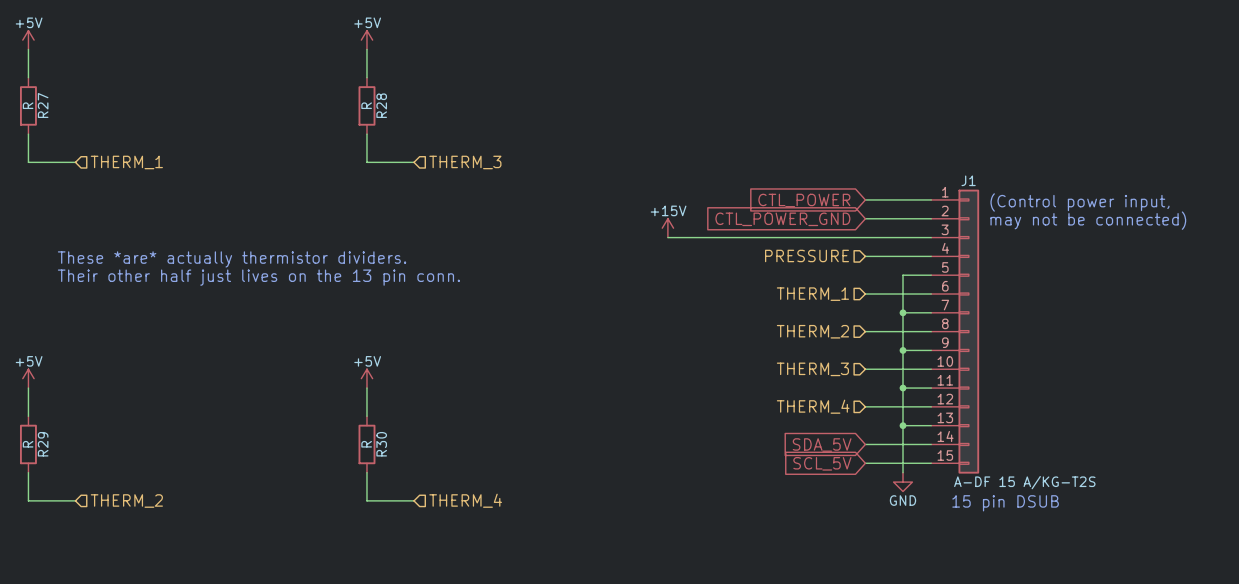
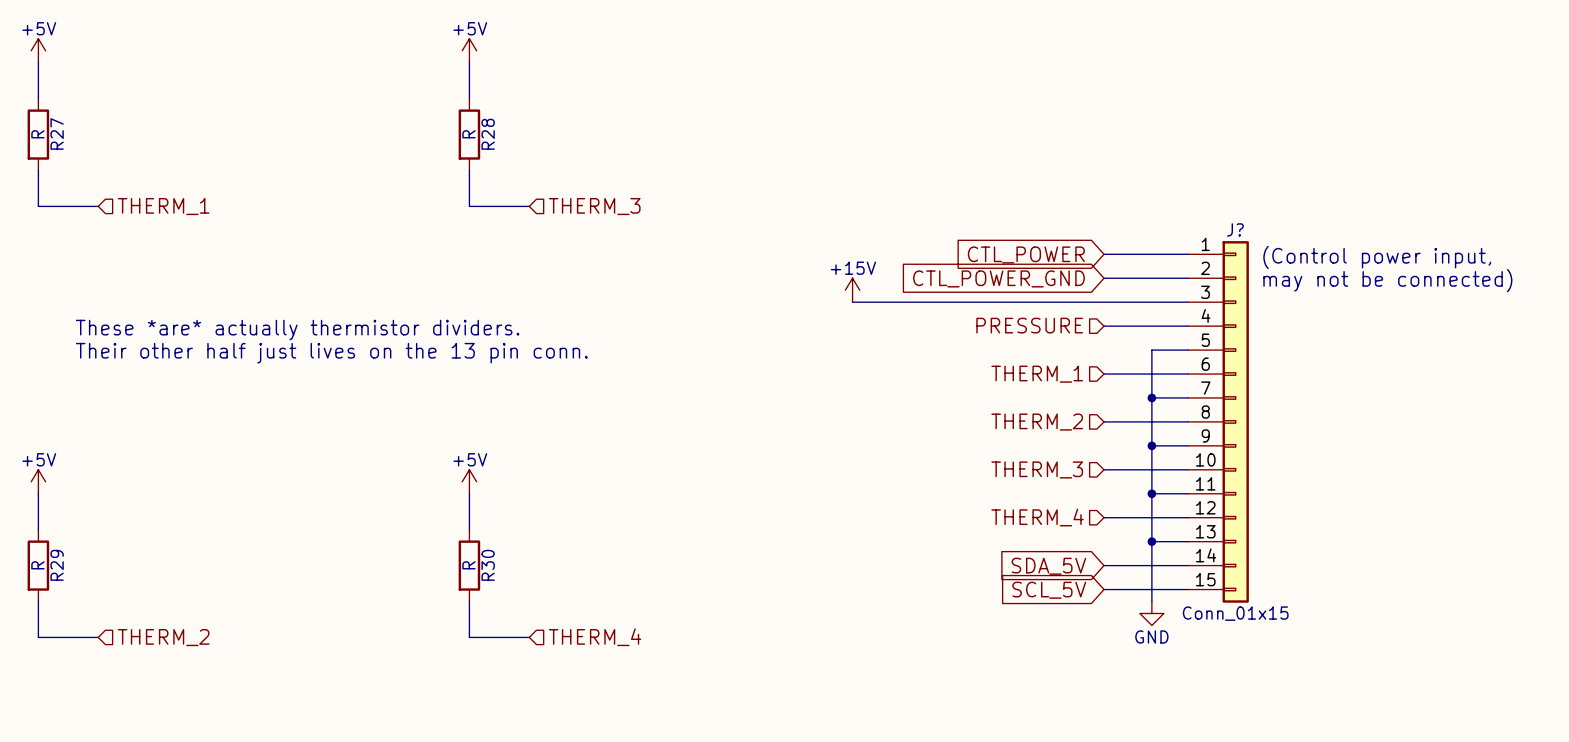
J1 name: J1 (968, 180) -> J? (1235, 229)
J1 value: A-DF 15 A/KG-T2S (1024, 482) -> Conn_01x15 (1235, 613)
text: 15 pin DSUB (1005, 503) -> none

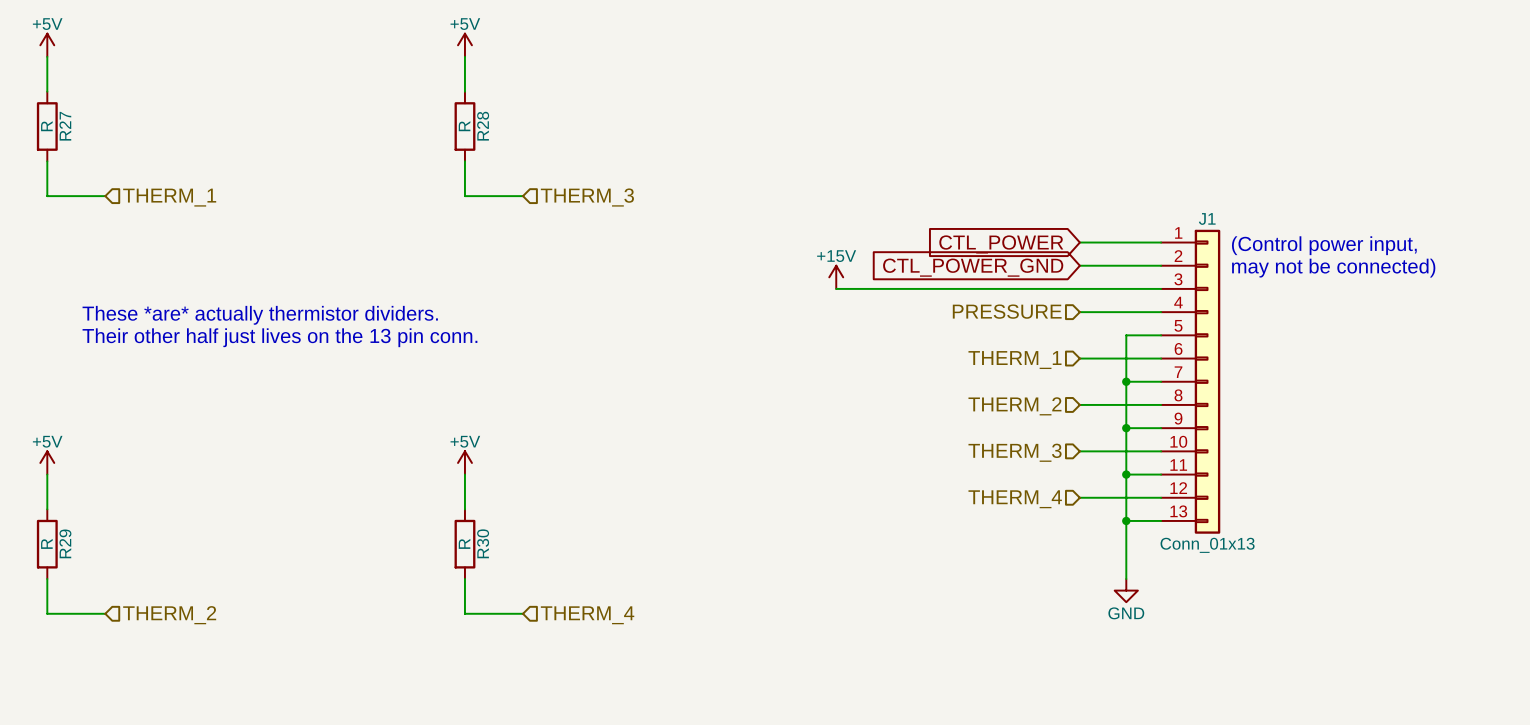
J1: none -> Conn_01x13 (1190, 381)
J?: Conn_01x15 (1218, 421) -> none
wire: (1104, 565) (1187, 565) -> none
global label: SDA_5V (1048, 566) -> none
wire: (1104, 589) (1187, 589) -> none
global label: SCL_5V (1049, 590) -> none

